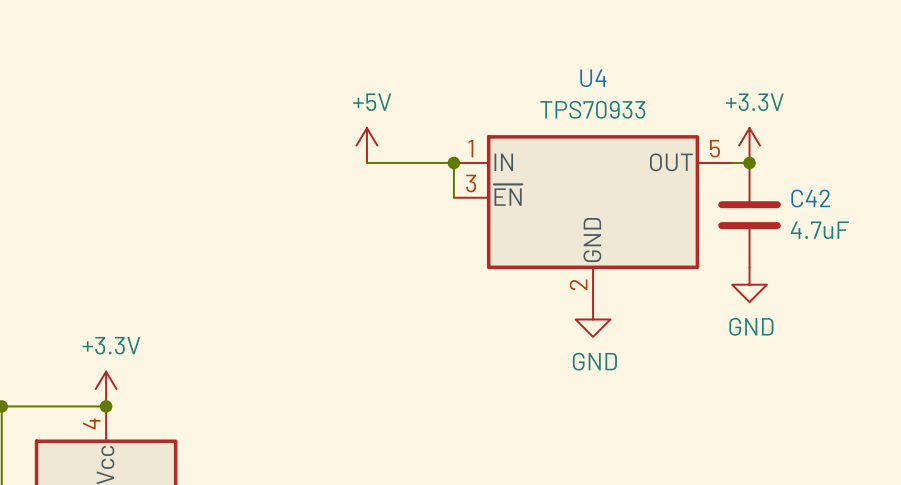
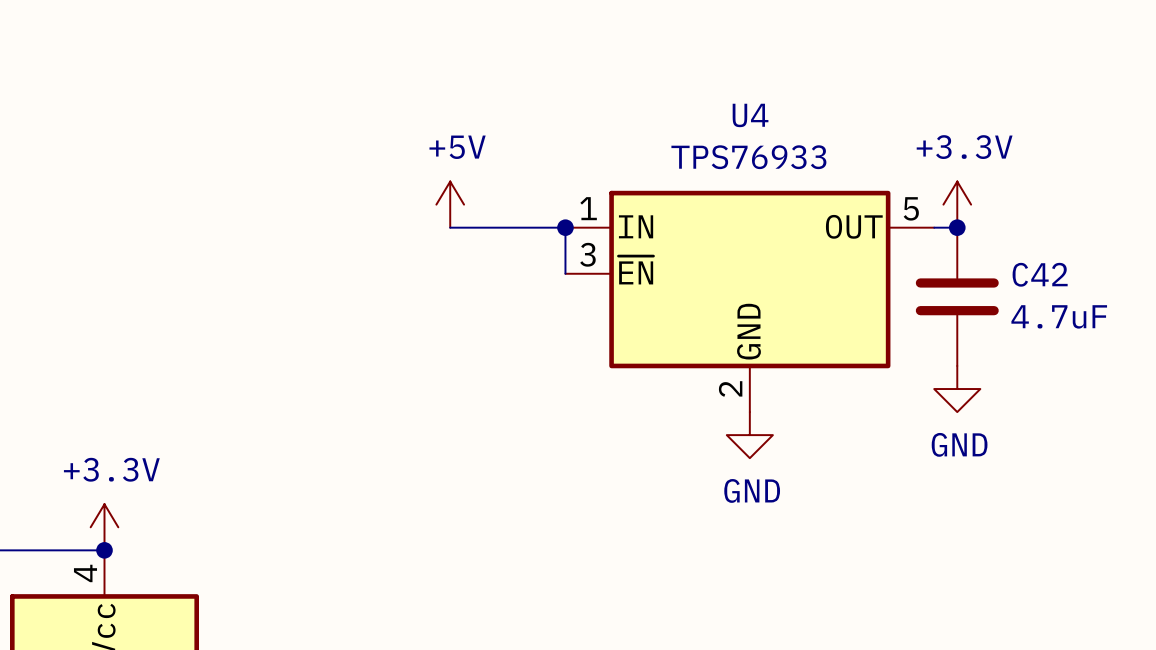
U4 value: TPS70933 (592, 109) -> TPS76933 (748, 157)

